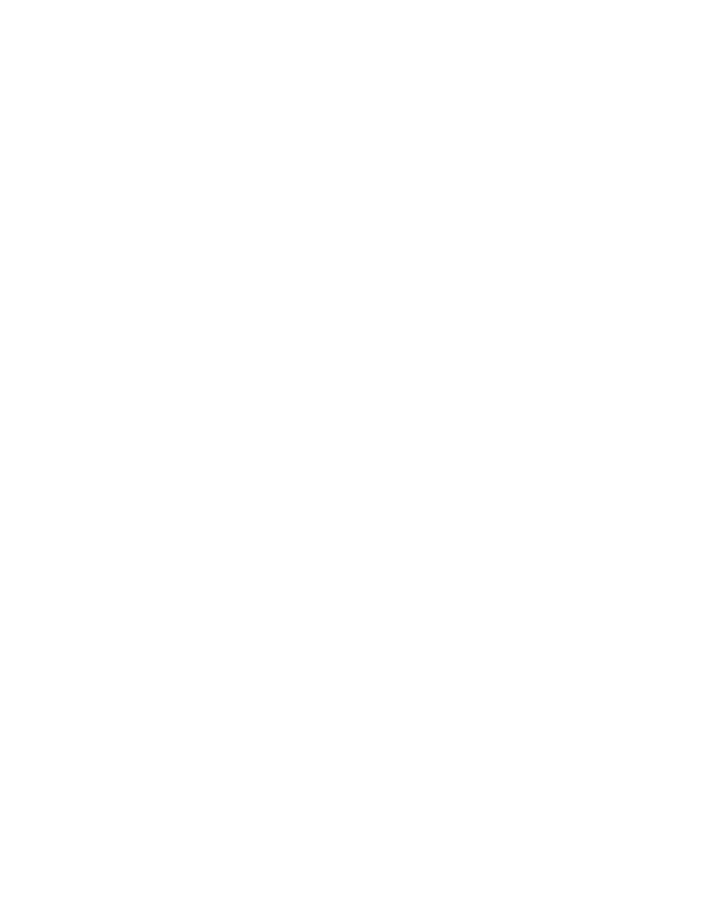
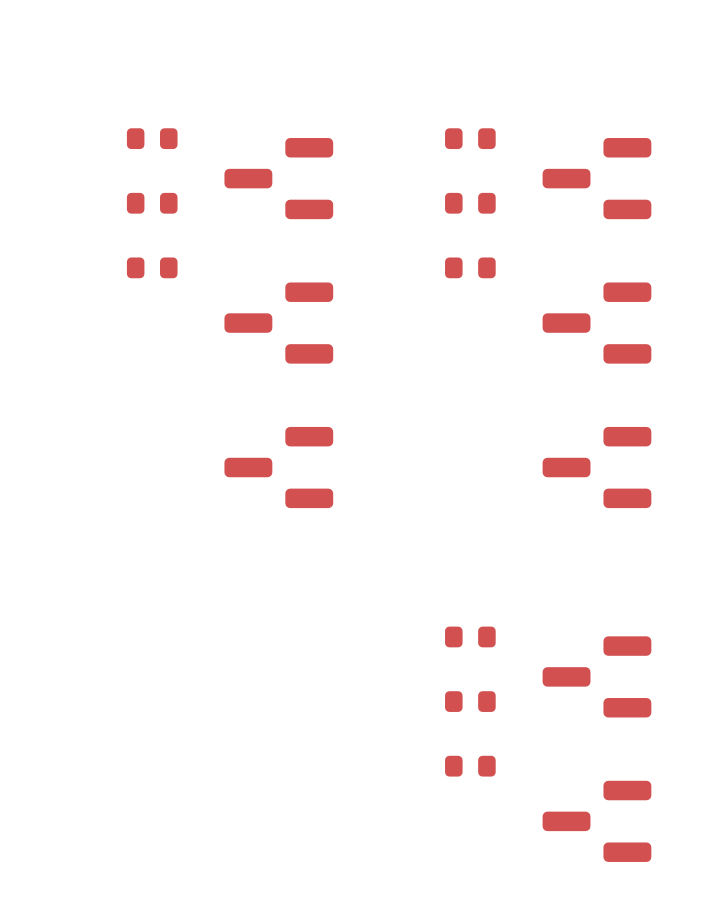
part: none -> (152, 138)
part: none -> (470, 138)
part: none -> (278, 178)
part: none -> (596, 178)
part: none -> (152, 203)
part: none -> (470, 203)
part: none -> (152, 267)
part: none -> (470, 267)
part: none -> (278, 323)
part: none -> (596, 323)
part: none -> (278, 467)
part: none -> (596, 467)
part: none -> (470, 636)
part: none -> (596, 676)
part: none -> (470, 701)
part: none -> (470, 766)
part: none -> (596, 821)

